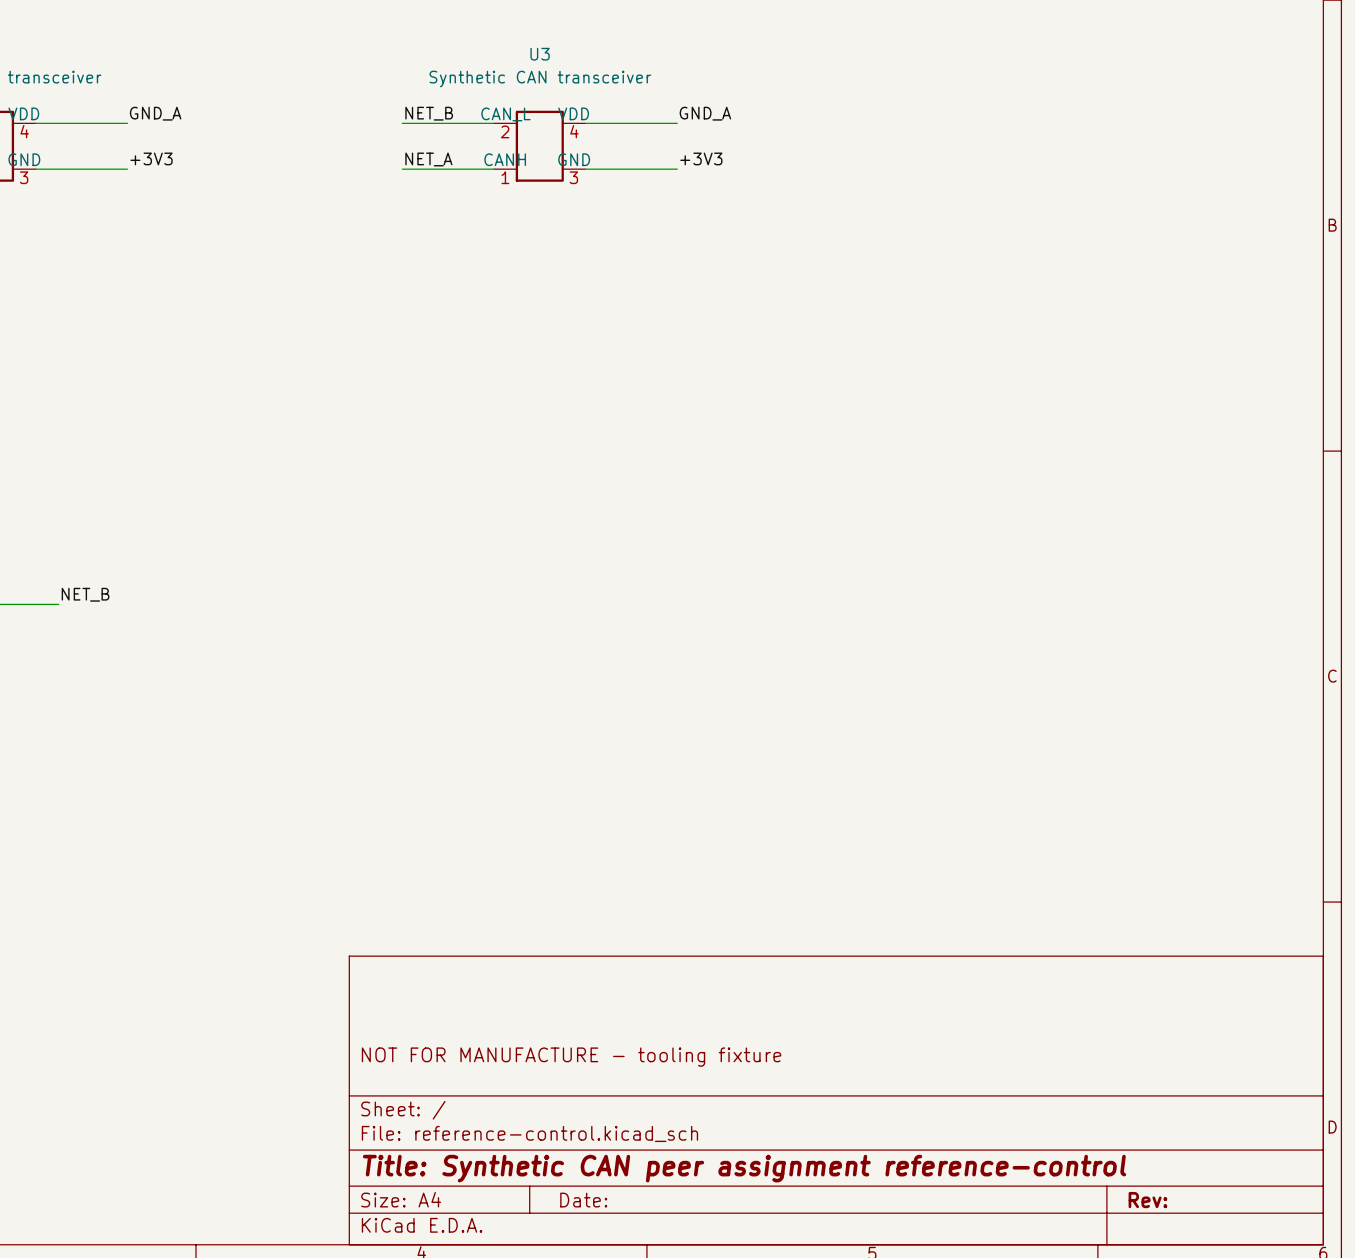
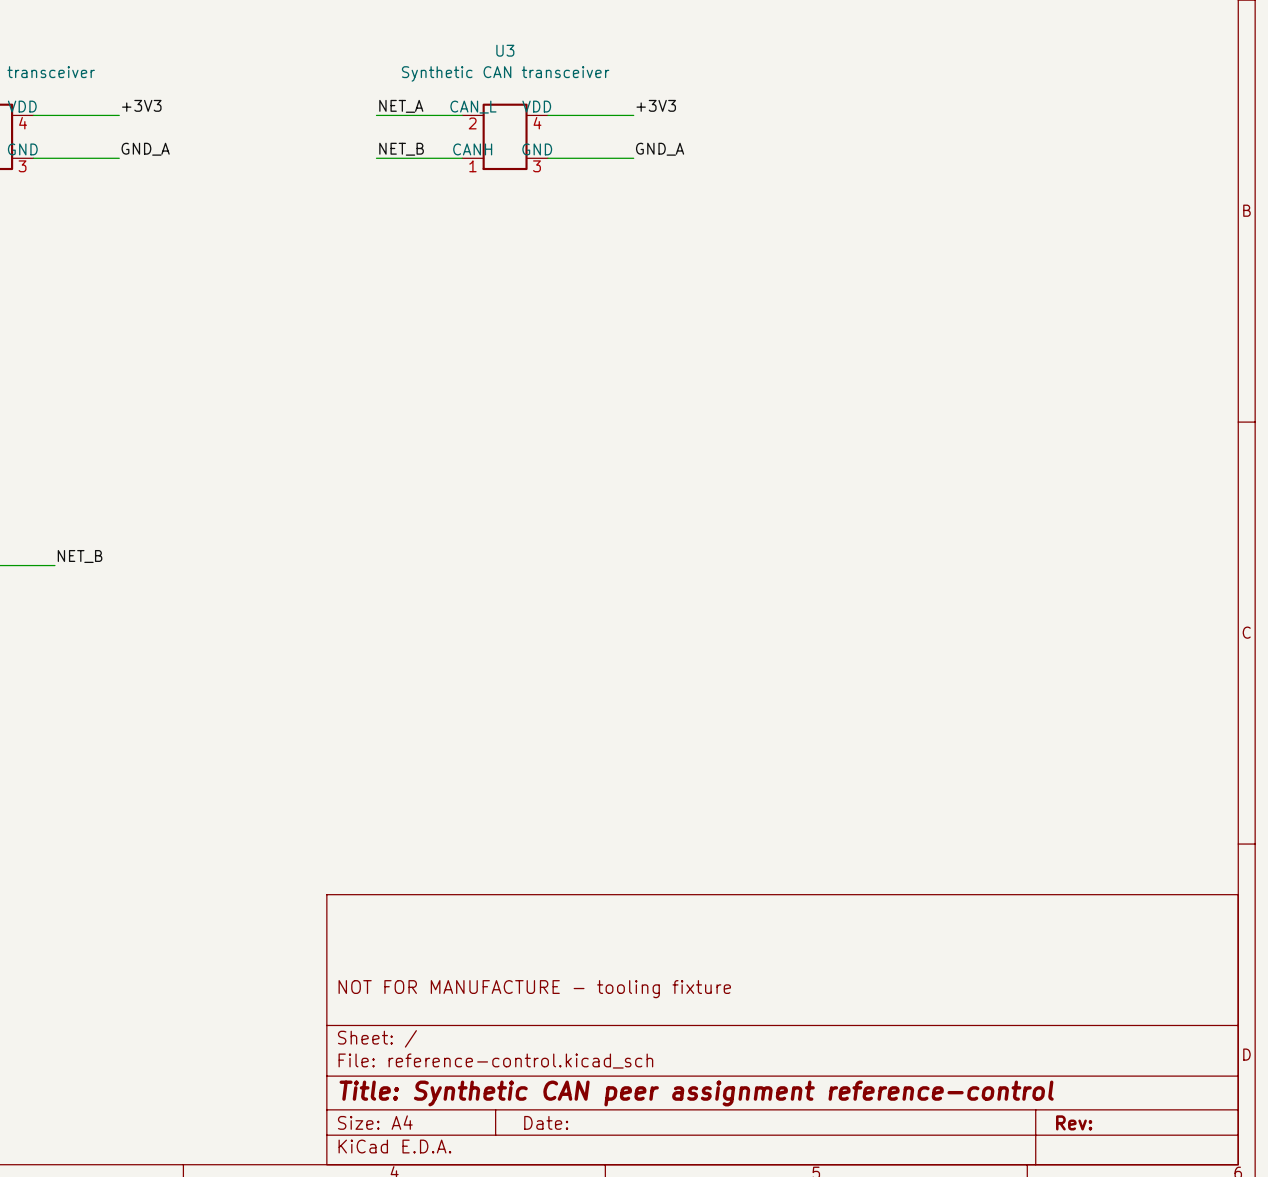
label: GND_A (155, 113) -> +3V3 (141, 105)
label: NET_B (429, 113) -> NET_A (401, 106)
label: GND_A (705, 113) -> +3V3 (656, 105)
label: +3V3 (151, 158) -> GND_A (145, 149)
label: +3V3 (701, 158) -> GND_A (660, 149)
label: NET_A (428, 159) -> NET_B (401, 149)

